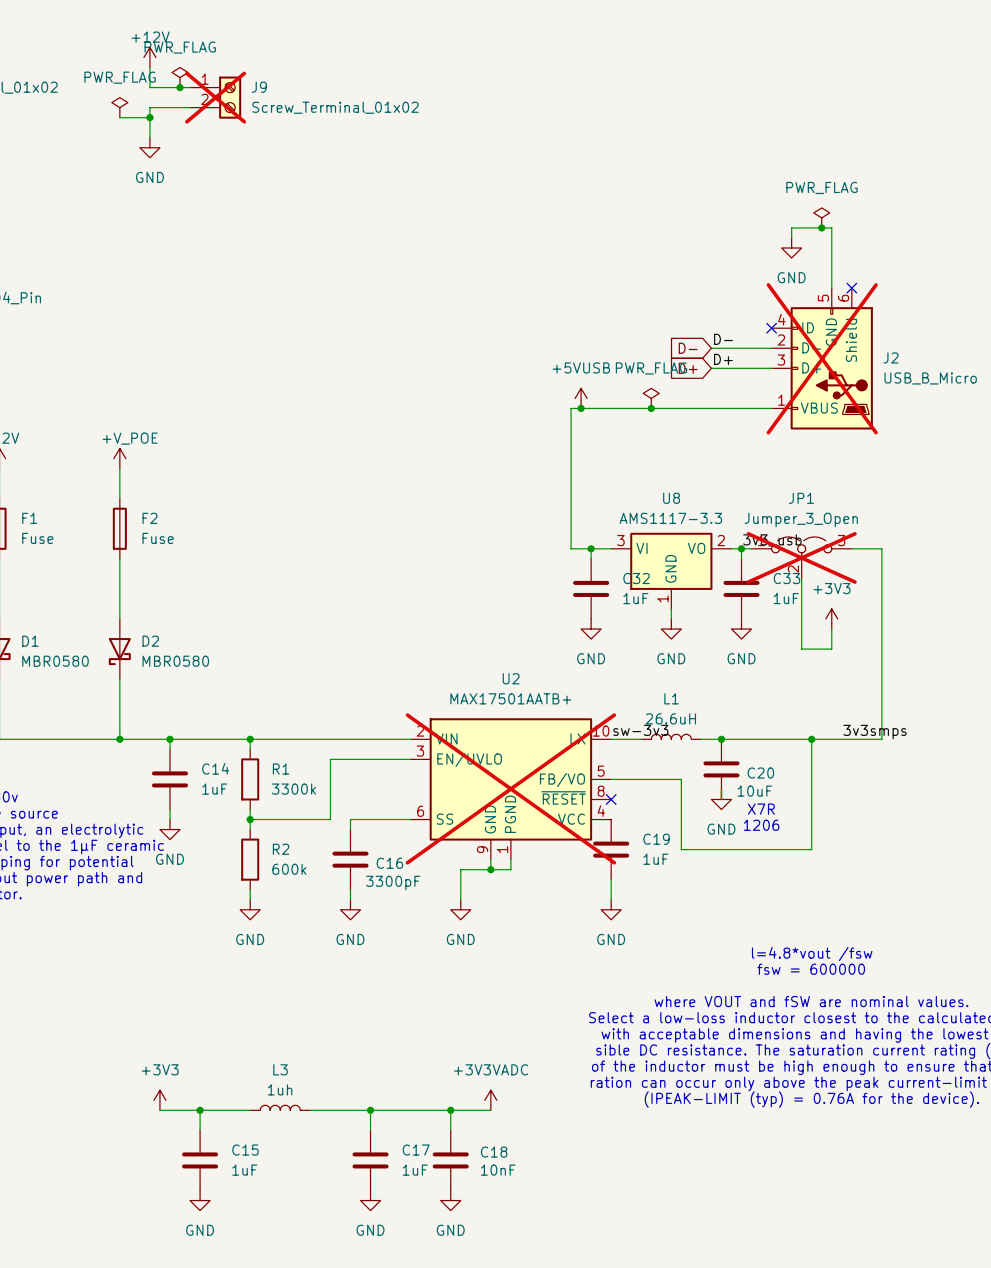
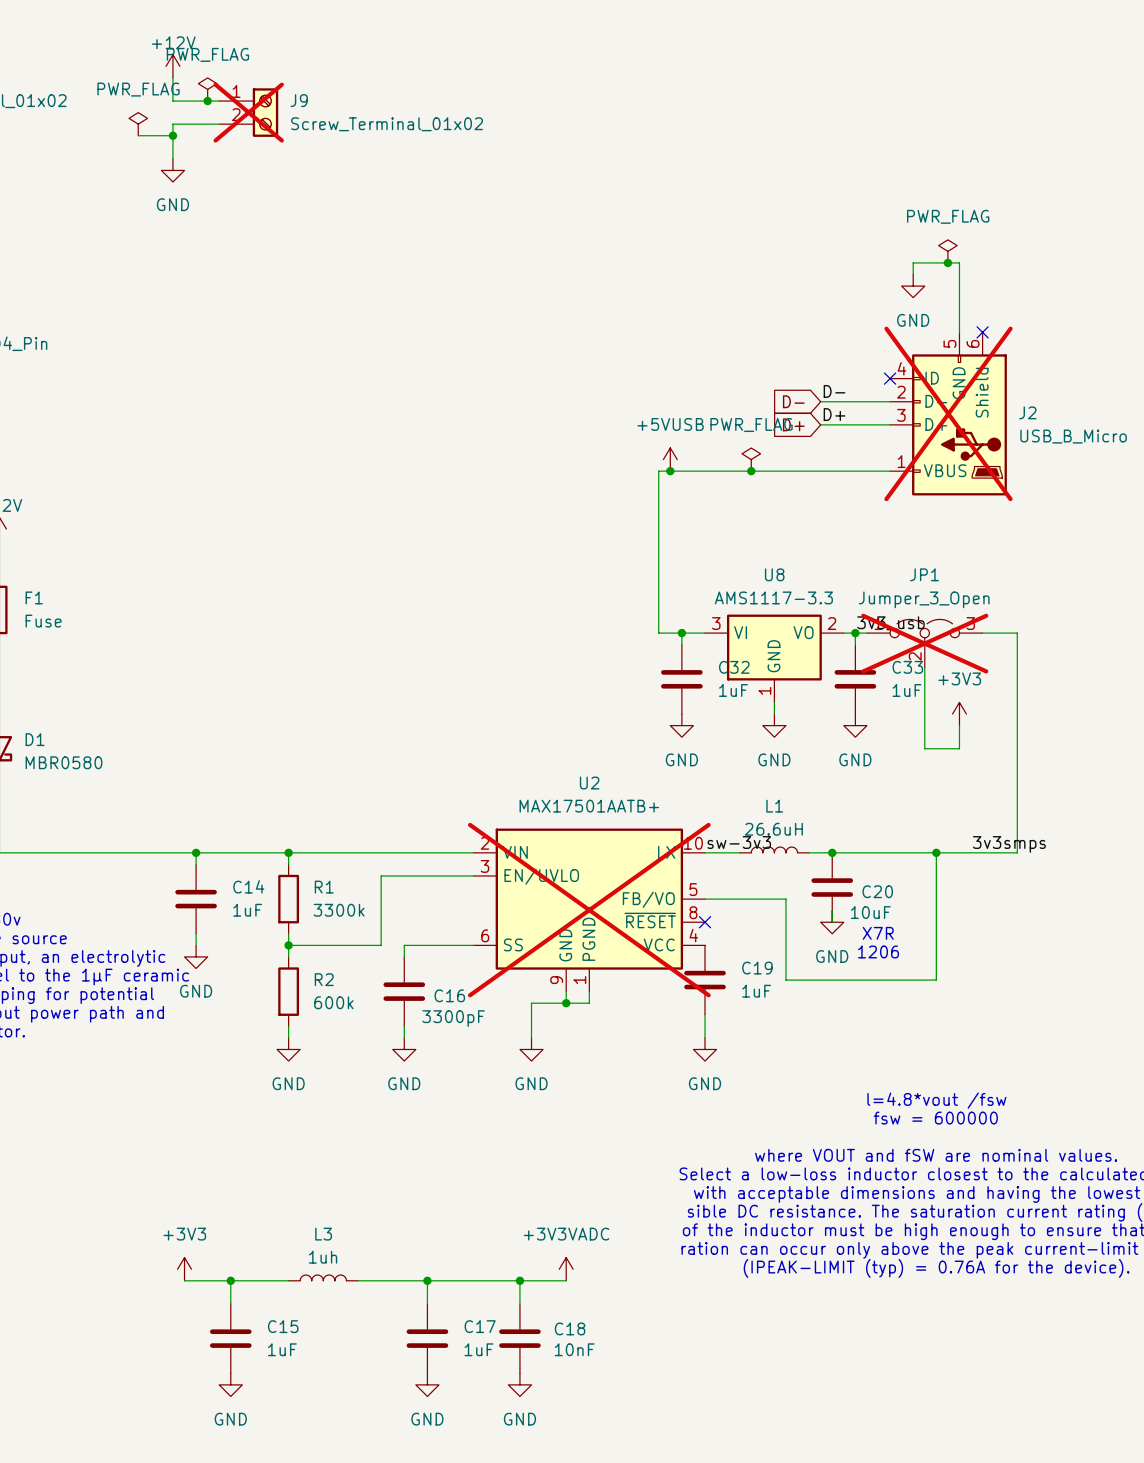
power symbol: +V_POE (119, 458) -> none
wire: (119, 468) (119, 498) -> none
F2: Fuse (119, 528) -> none
wire: (119, 558) (119, 619) -> none
D2: MBR0580 (119, 649) -> none
wire: (119, 679) (119, 739) -> none
junction: (119, 739) -> none

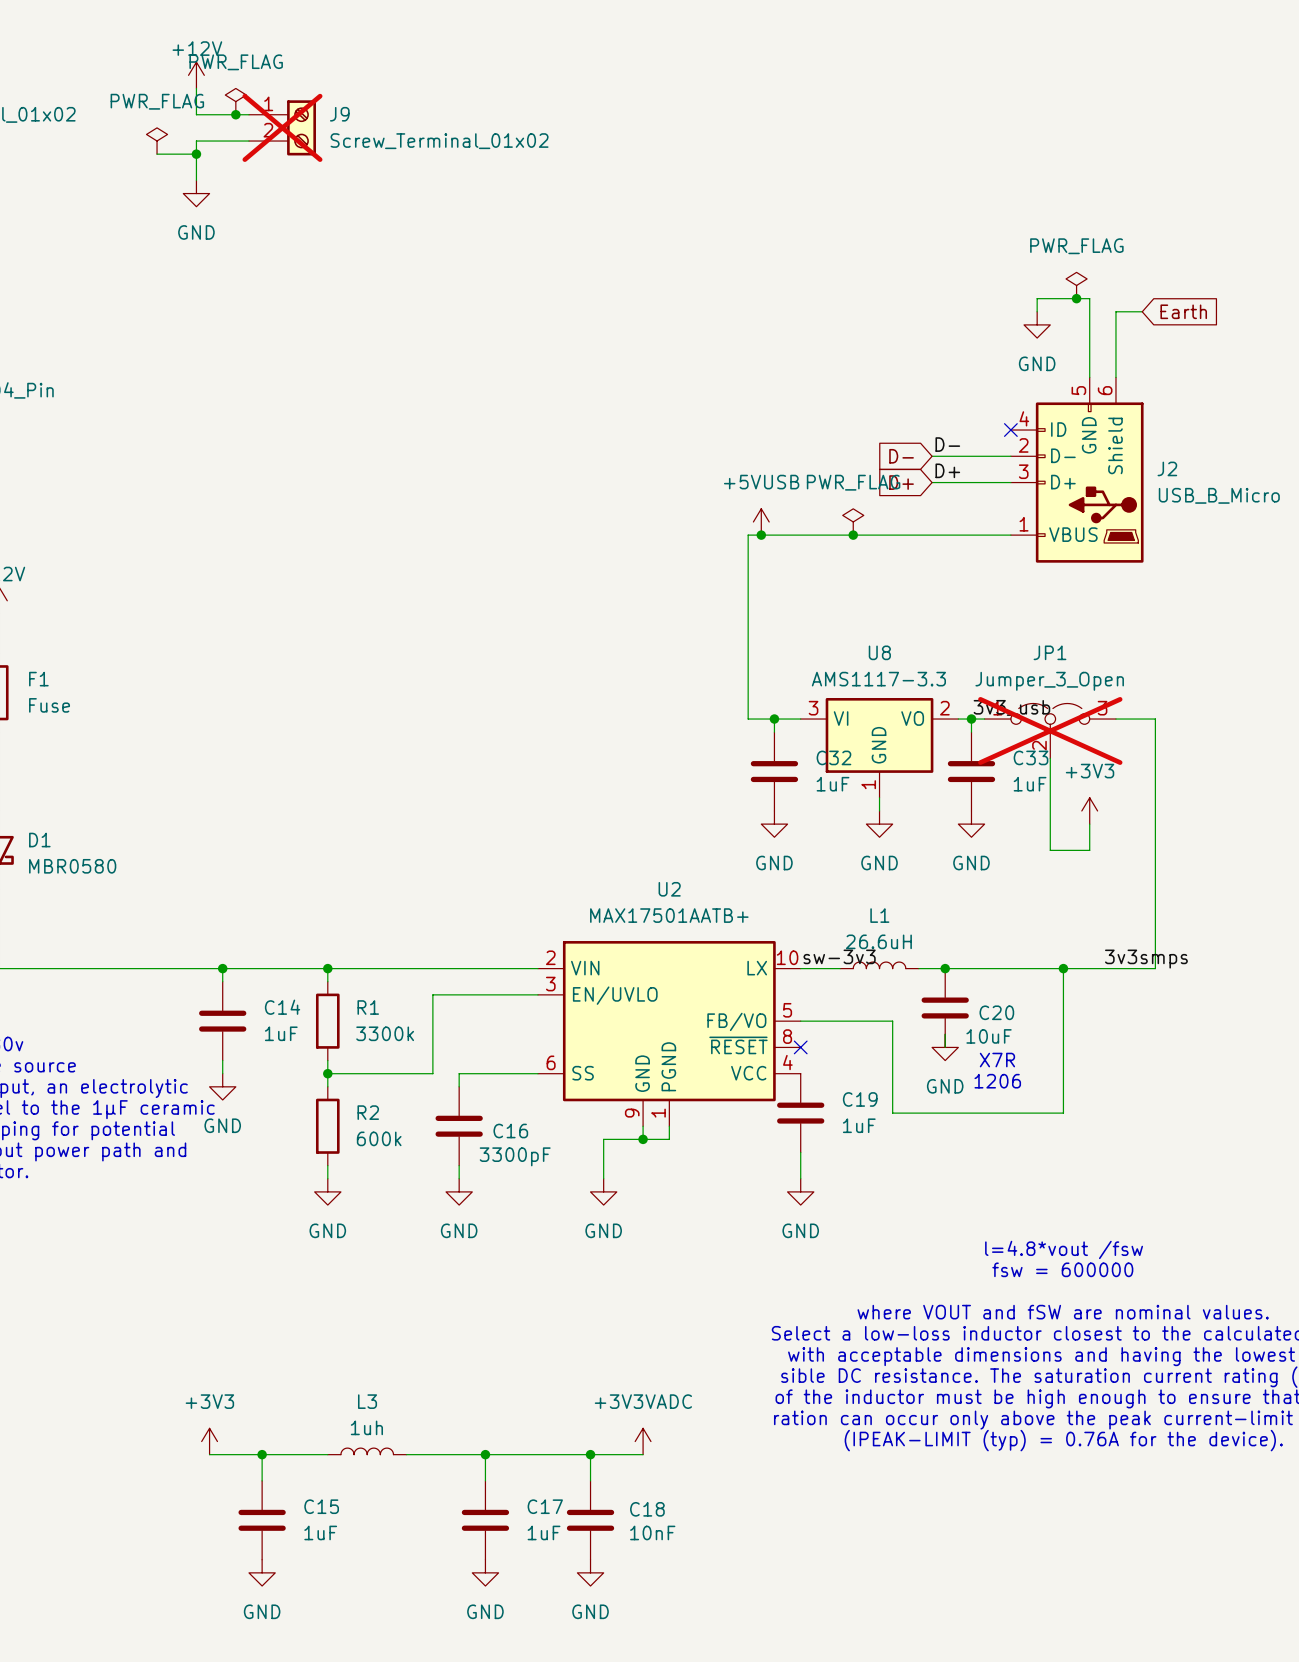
wire: none -> (1142, 311) (1115, 311) (1115, 377)
global label: none -> Earth (1183, 311)
no-connect mark: (982, 332) -> none
J2 do-not-place cross: (948, 413) -> none
U2 do-not-place cross: (589, 910) -> none

